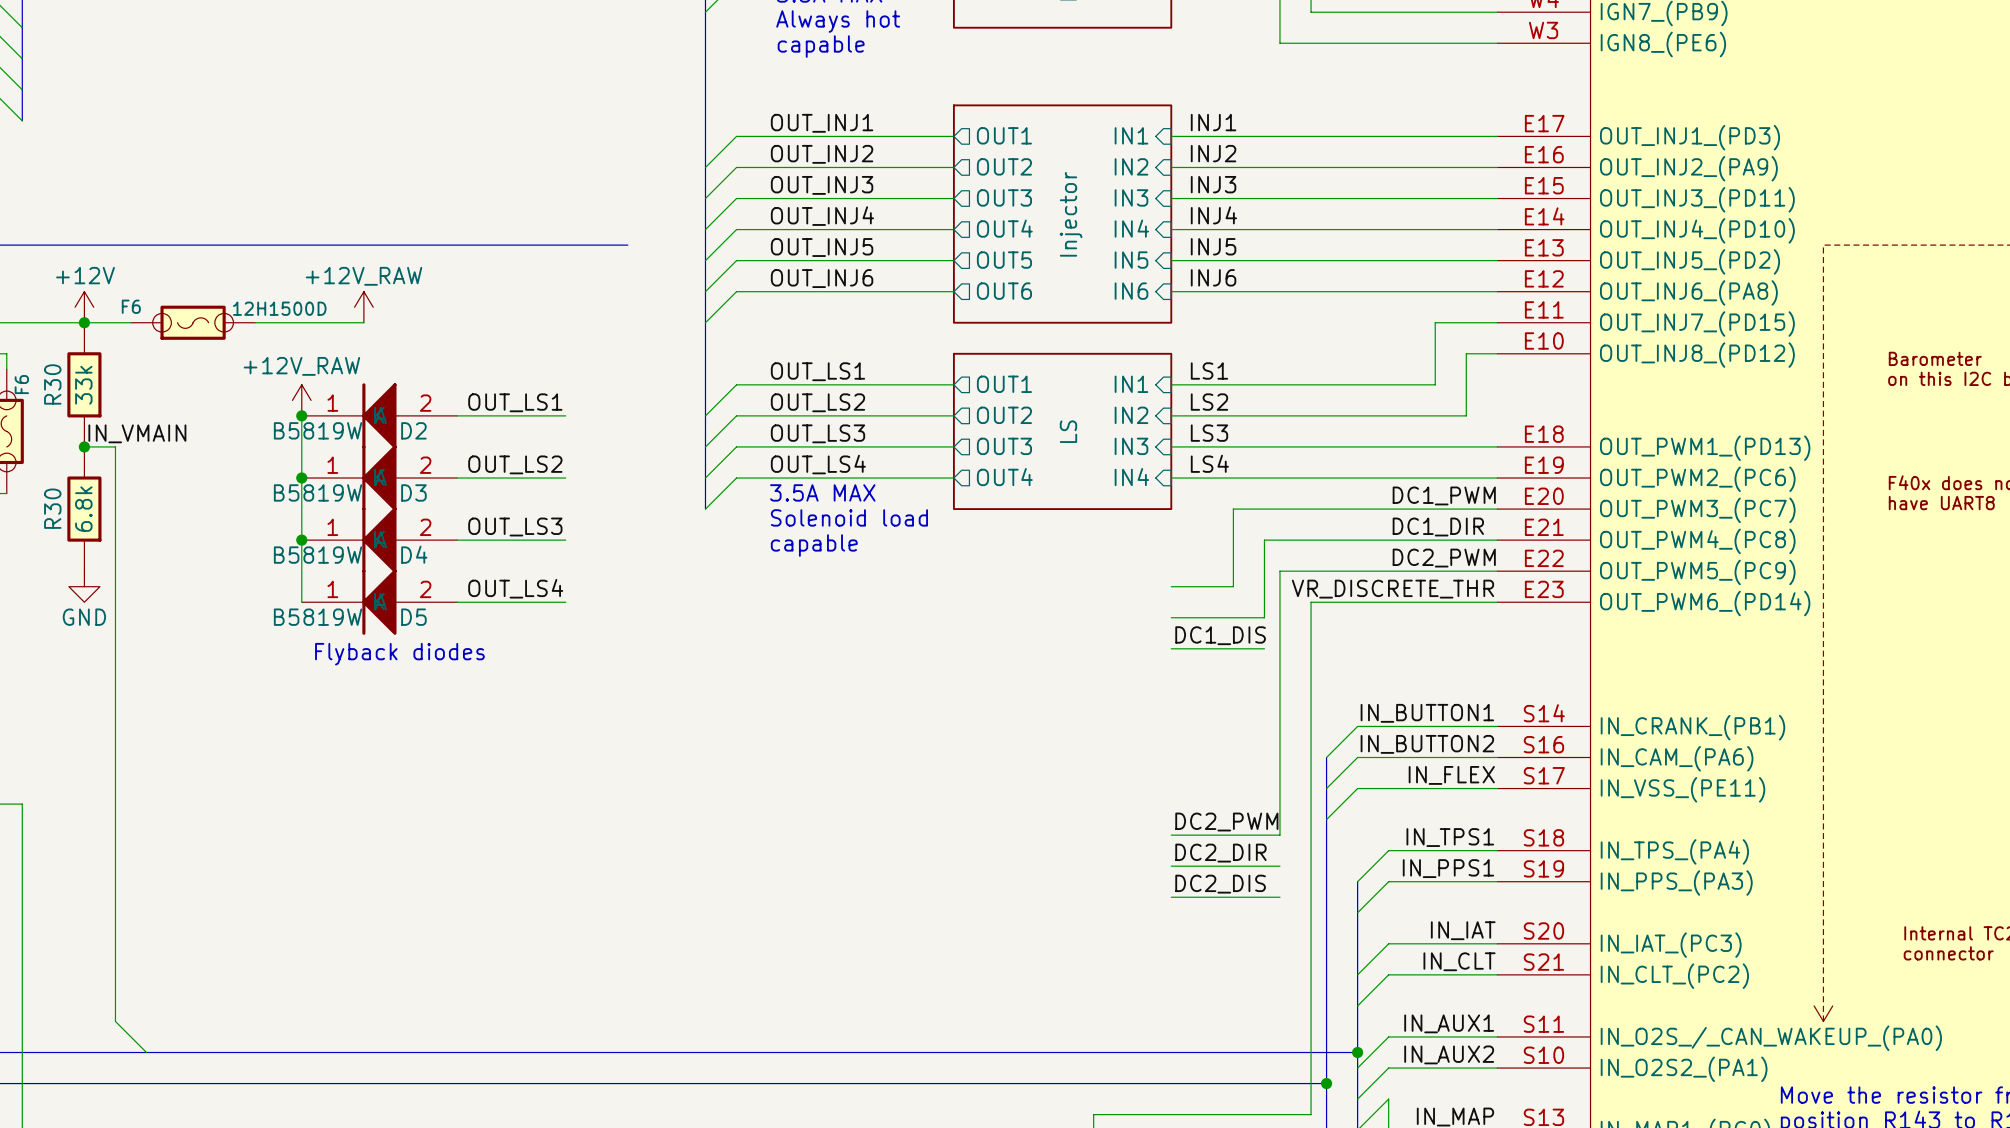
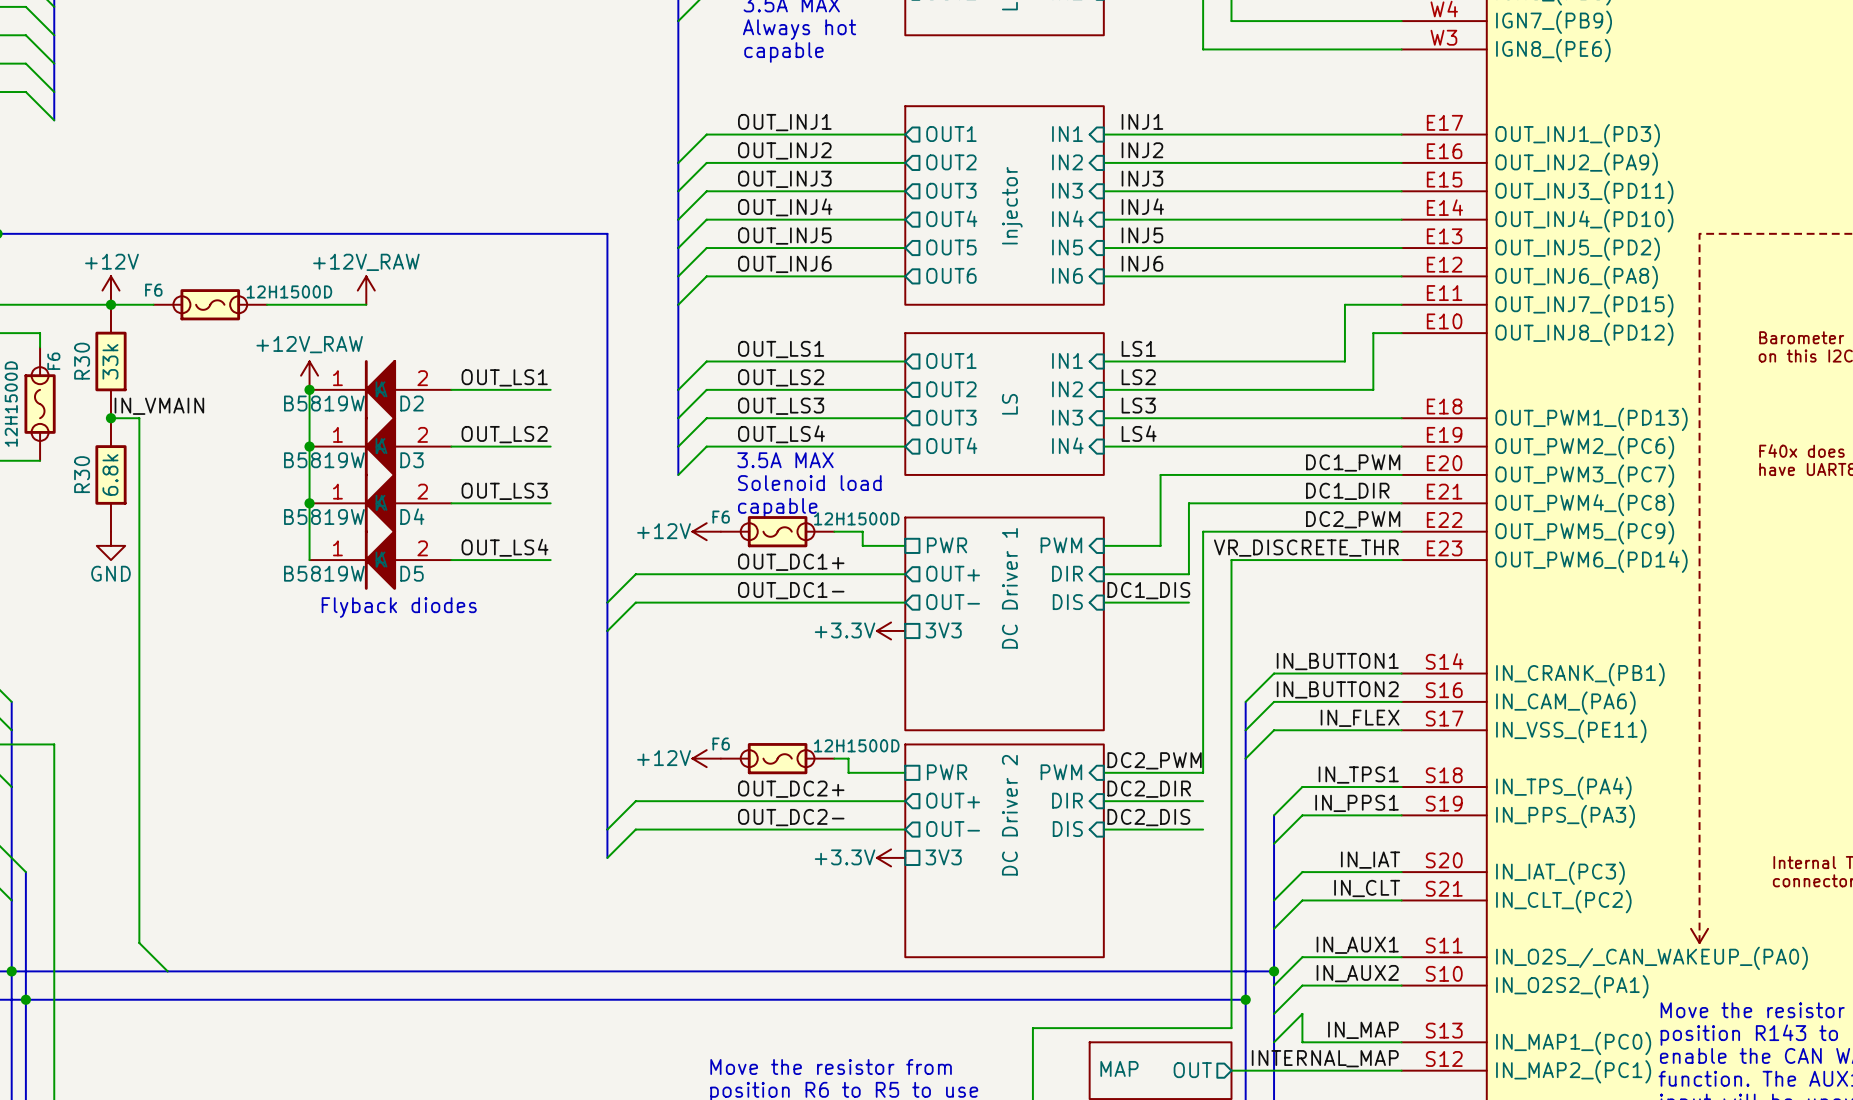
bus: none -> (607, 233) (607, 857)
power symbol: none -> +12V (706, 531)
F6: none -> 12H1500D (777, 531)
wire: none -> (834, 531) (862, 531) (862, 545) (905, 545)
sheet pin: none -> PWR (947, 545)
sheet pin: none -> PWM (1061, 545)
label: none -> OUT_DC1+ (791, 562)
wire: none -> (905, 574) (635, 574) (607, 602)
sheet pin: none -> OUT+ (953, 573)
sheet pin: none -> DIR (1067, 573)
label: none -> OUT_DC1- (791, 590)
wire: none -> (905, 602) (635, 602) (607, 630)
sheet pin: none -> OUT- (953, 602)
sheet pin: none -> DIS (1067, 602)
sheet DC Driver 1: none -> (1004, 623)
power symbol: none -> +3.3V (891, 630)
sheet pin: none -> 3V3 (943, 630)
power symbol: none -> +12V (706, 758)
F6: none -> 12H1500D (777, 758)
wire: none -> (834, 758) (848, 758) (848, 772) (905, 772)
sheet pin: none -> PWR (947, 772)
sheet pin: none -> PWM (1061, 772)
label: none -> OUT_DC2+ (791, 789)
sheet pin: none -> OUT+ (953, 800)
sheet pin: none -> DIR (1067, 800)
wire: none -> (905, 801) (635, 801) (607, 829)
label: none -> OUT_DC2- (791, 817)
sheet pin: none -> OUT- (953, 829)
sheet pin: none -> DIS (1067, 829)
wire: none -> (905, 829) (635, 829) (607, 857)
sheet DC Driver 2: none -> (1004, 850)
sheet pin: none -> 3V3 (943, 857)
power symbol: none -> +3.3V (891, 857)

